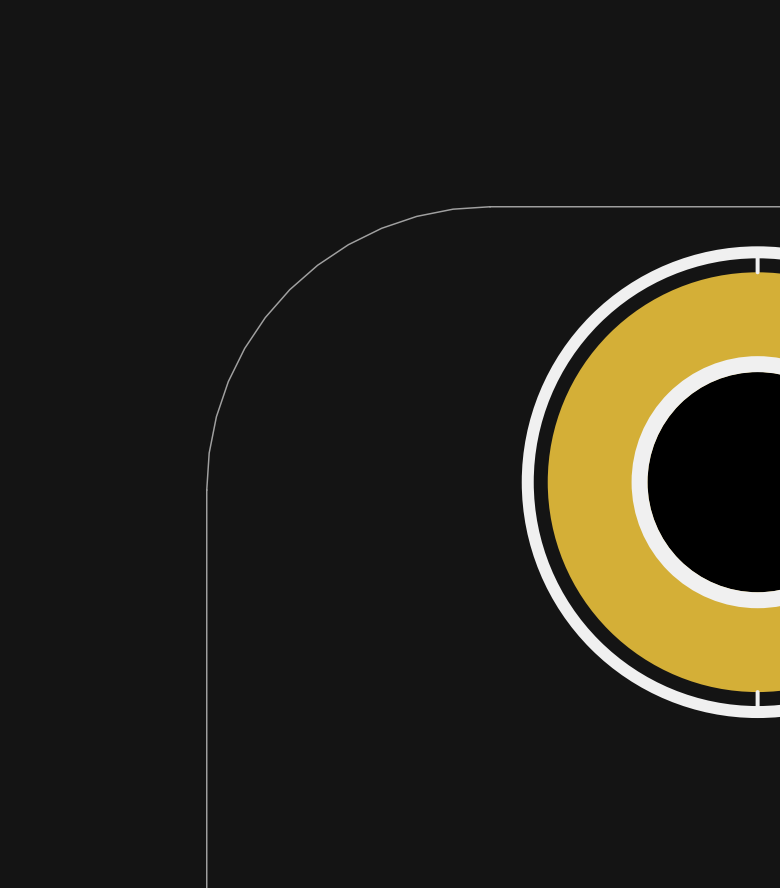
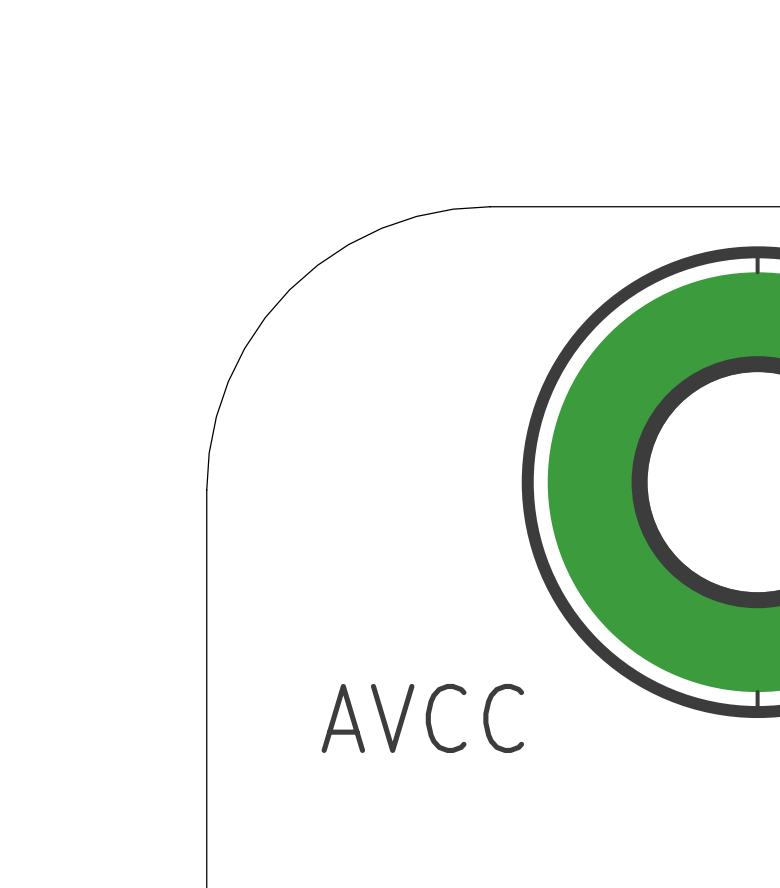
text: none -> AVCC (422, 718)

